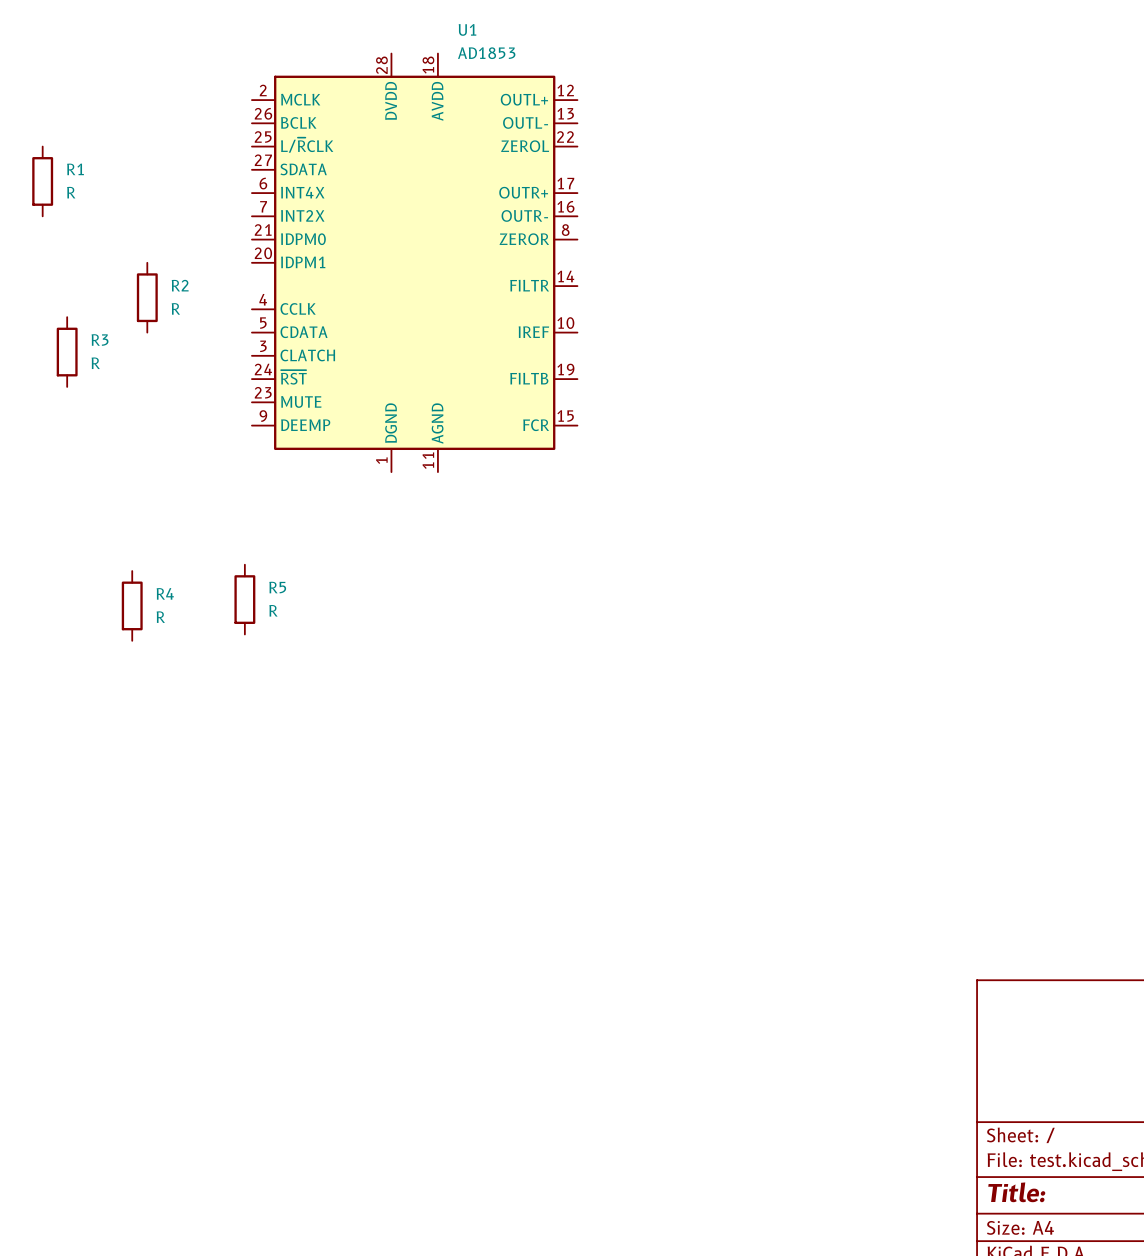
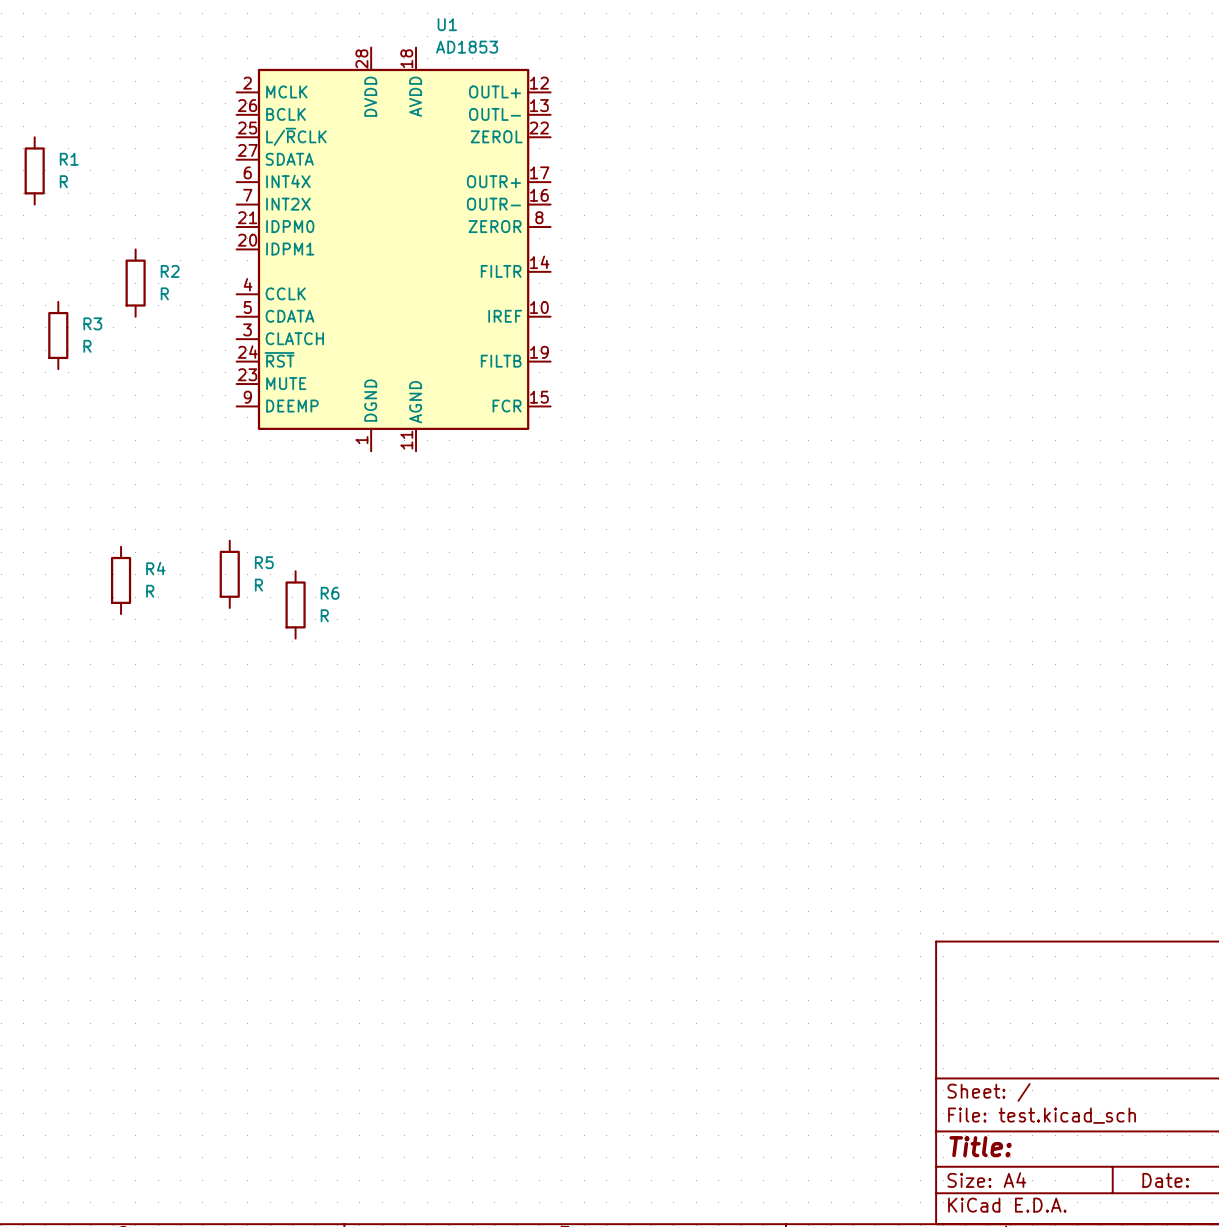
R6: none -> R (295, 604)

